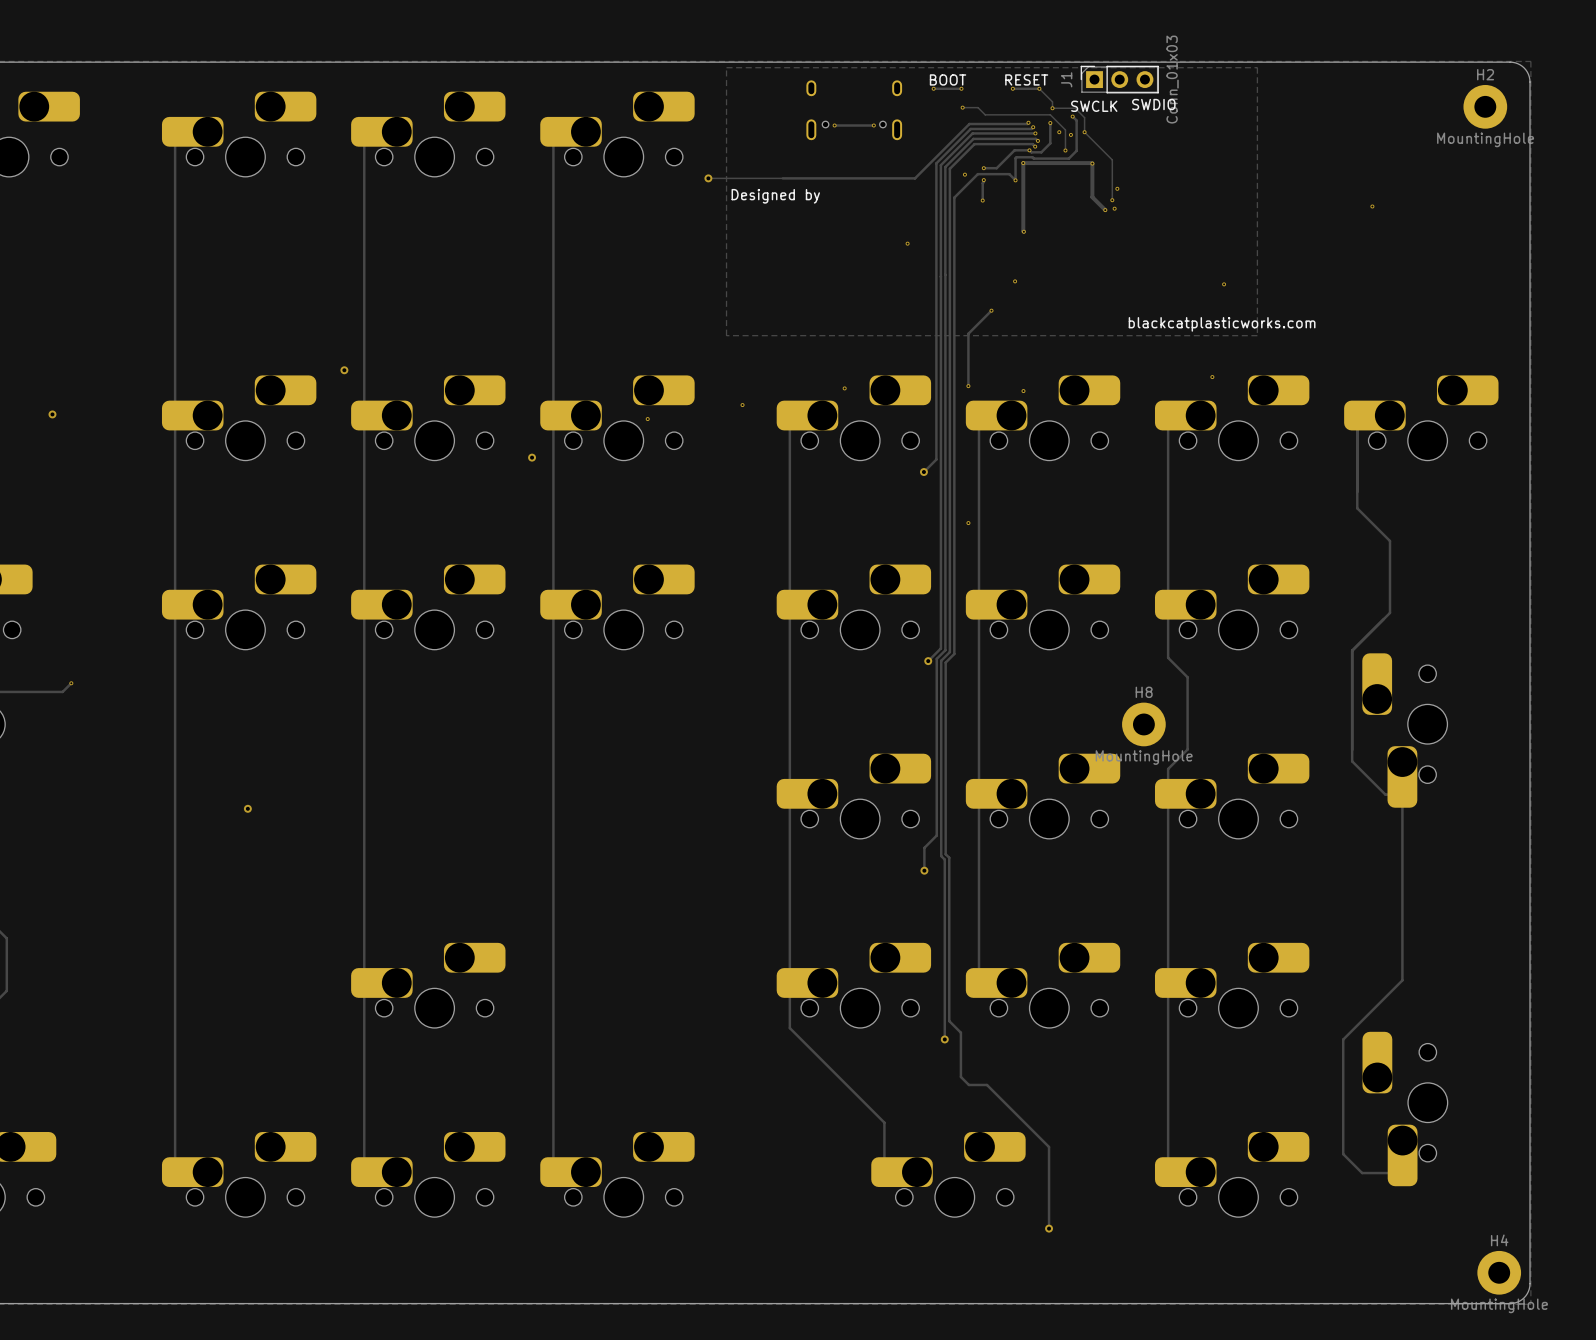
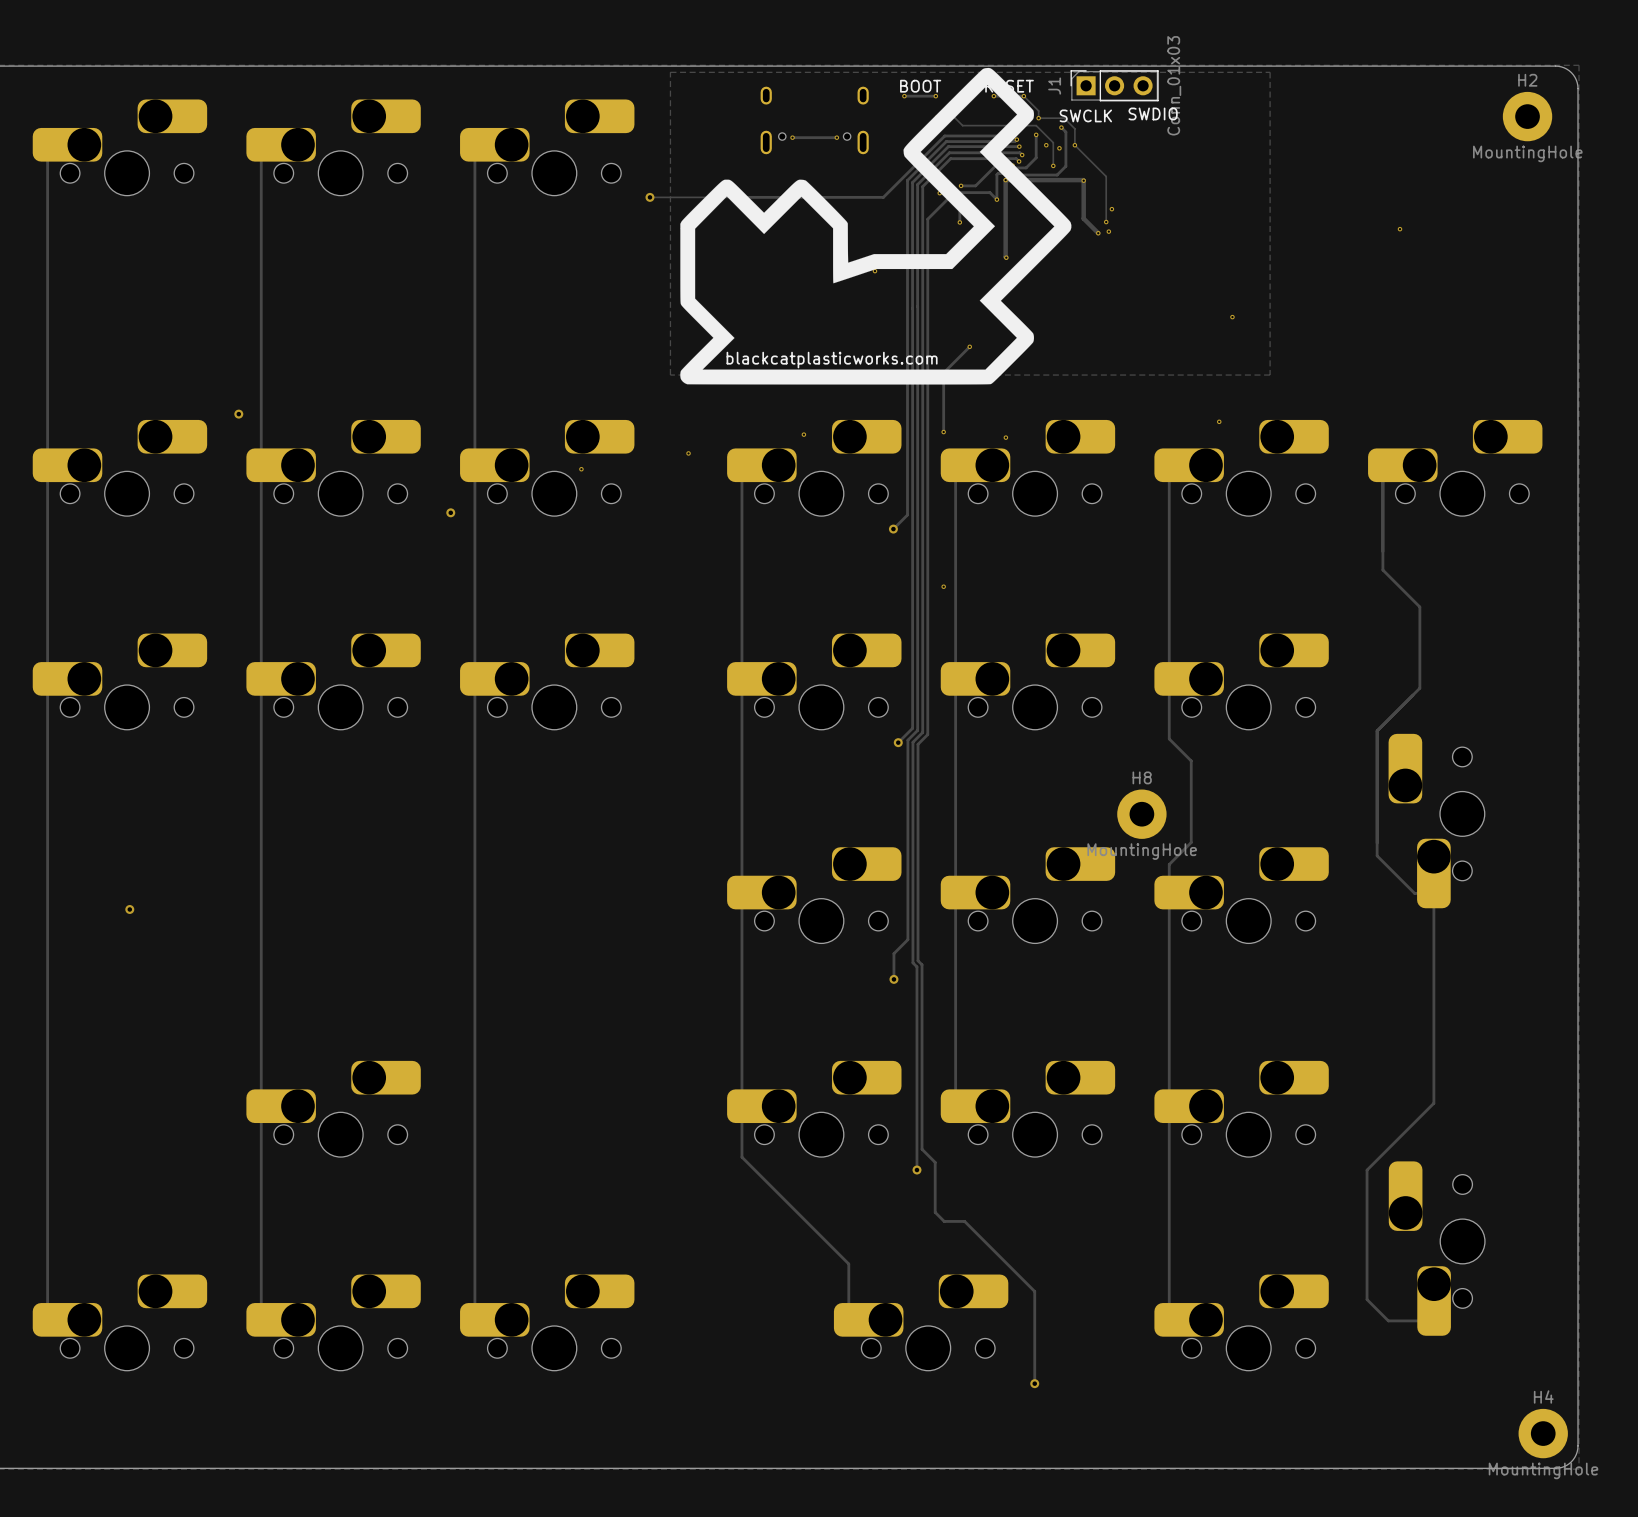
drawing: none -> [680, 67, 1072, 385]
text: Designed by (775, 196) -> none
text: none -> blackcatplasticworks.com (832, 360)
text: blackcatplasticworks.com (1222, 324) -> none

